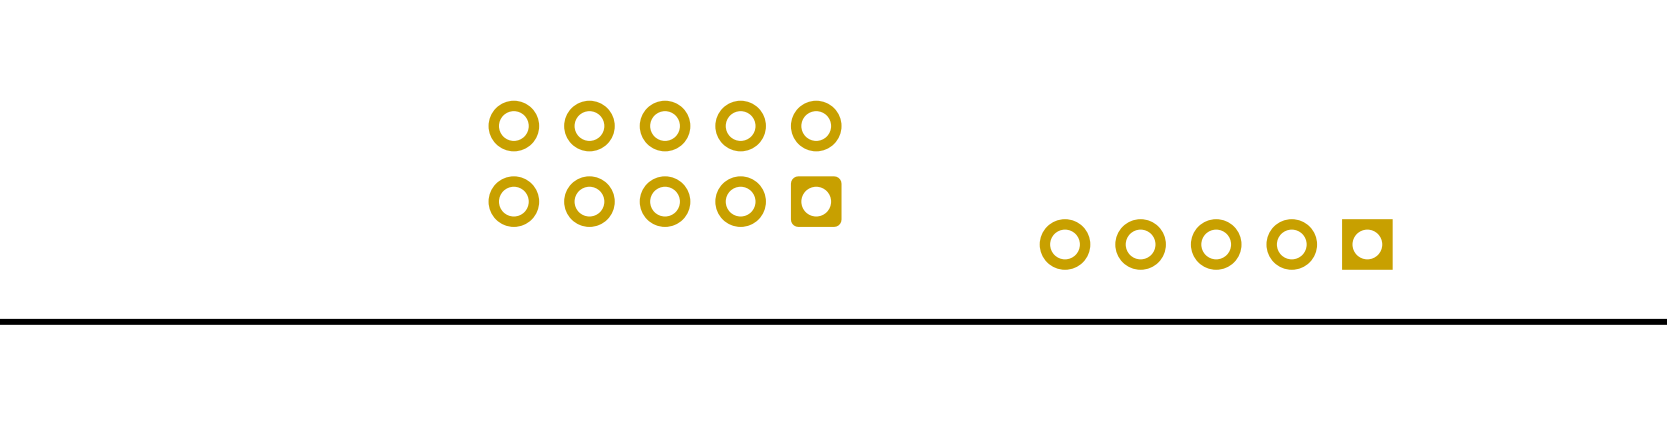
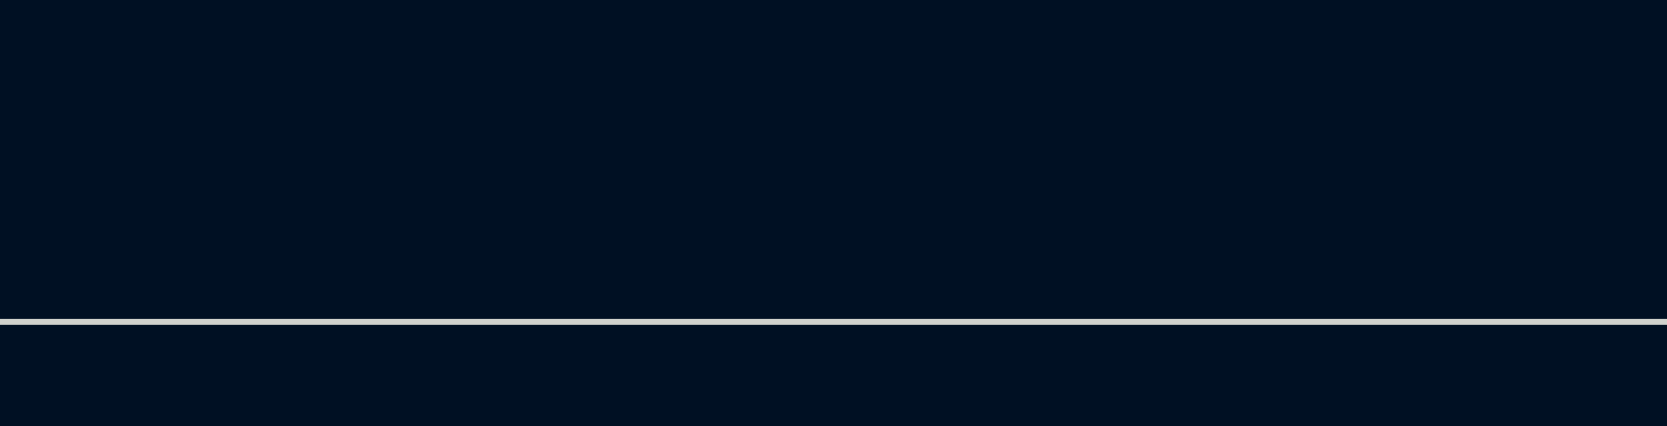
part: (665, 163) -> none
part: (1216, 244) -> none

